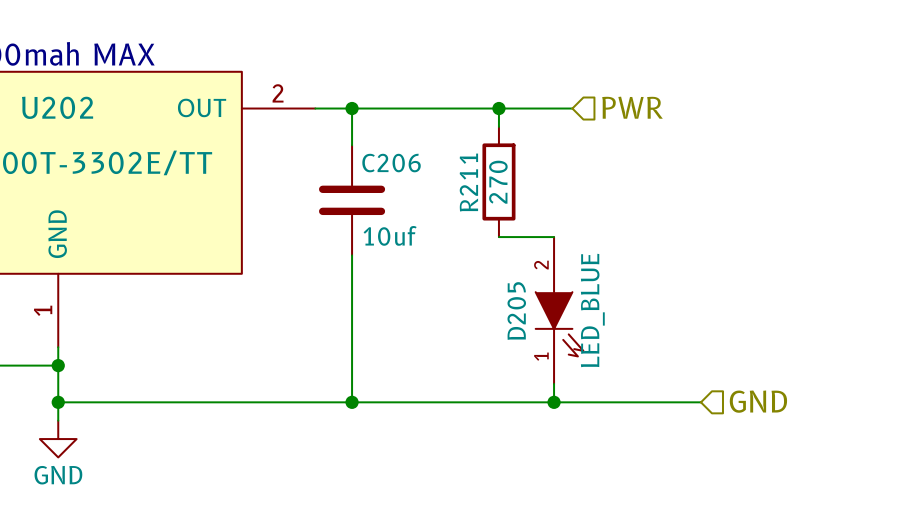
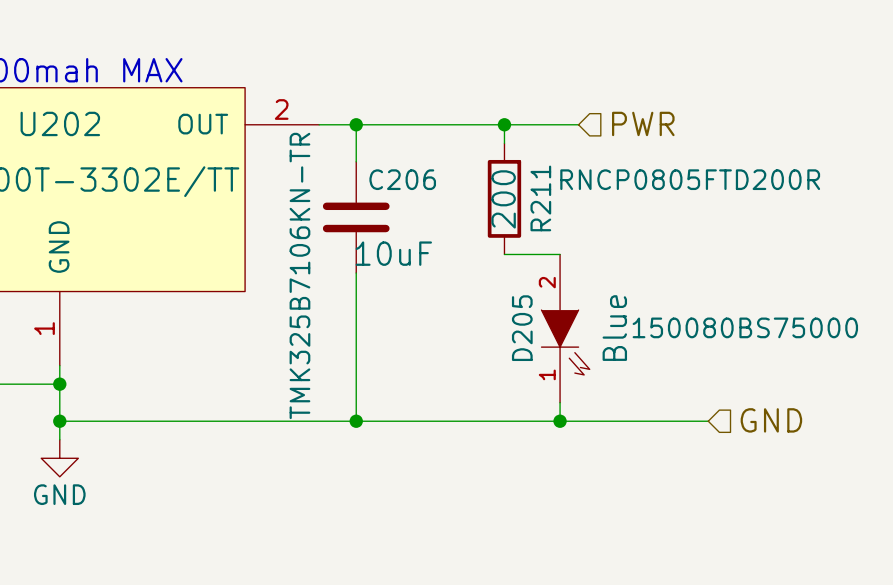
R211 name position: R211 (468, 182) -> R211 (540, 198)
R211 text: none -> 200 (503, 199)
R211 value: 270 (498, 182) -> RNCP0805FTD200R (690, 179)
C206 value: 10uf (390, 235) -> TMK325B7106KN-TR (299, 275)
C206 text: none -> 10uF (393, 253)
D205 value: LED_BLUE (592, 310) -> 150080BS75000 (745, 327)
D205 text: none -> Blue (614, 328)

